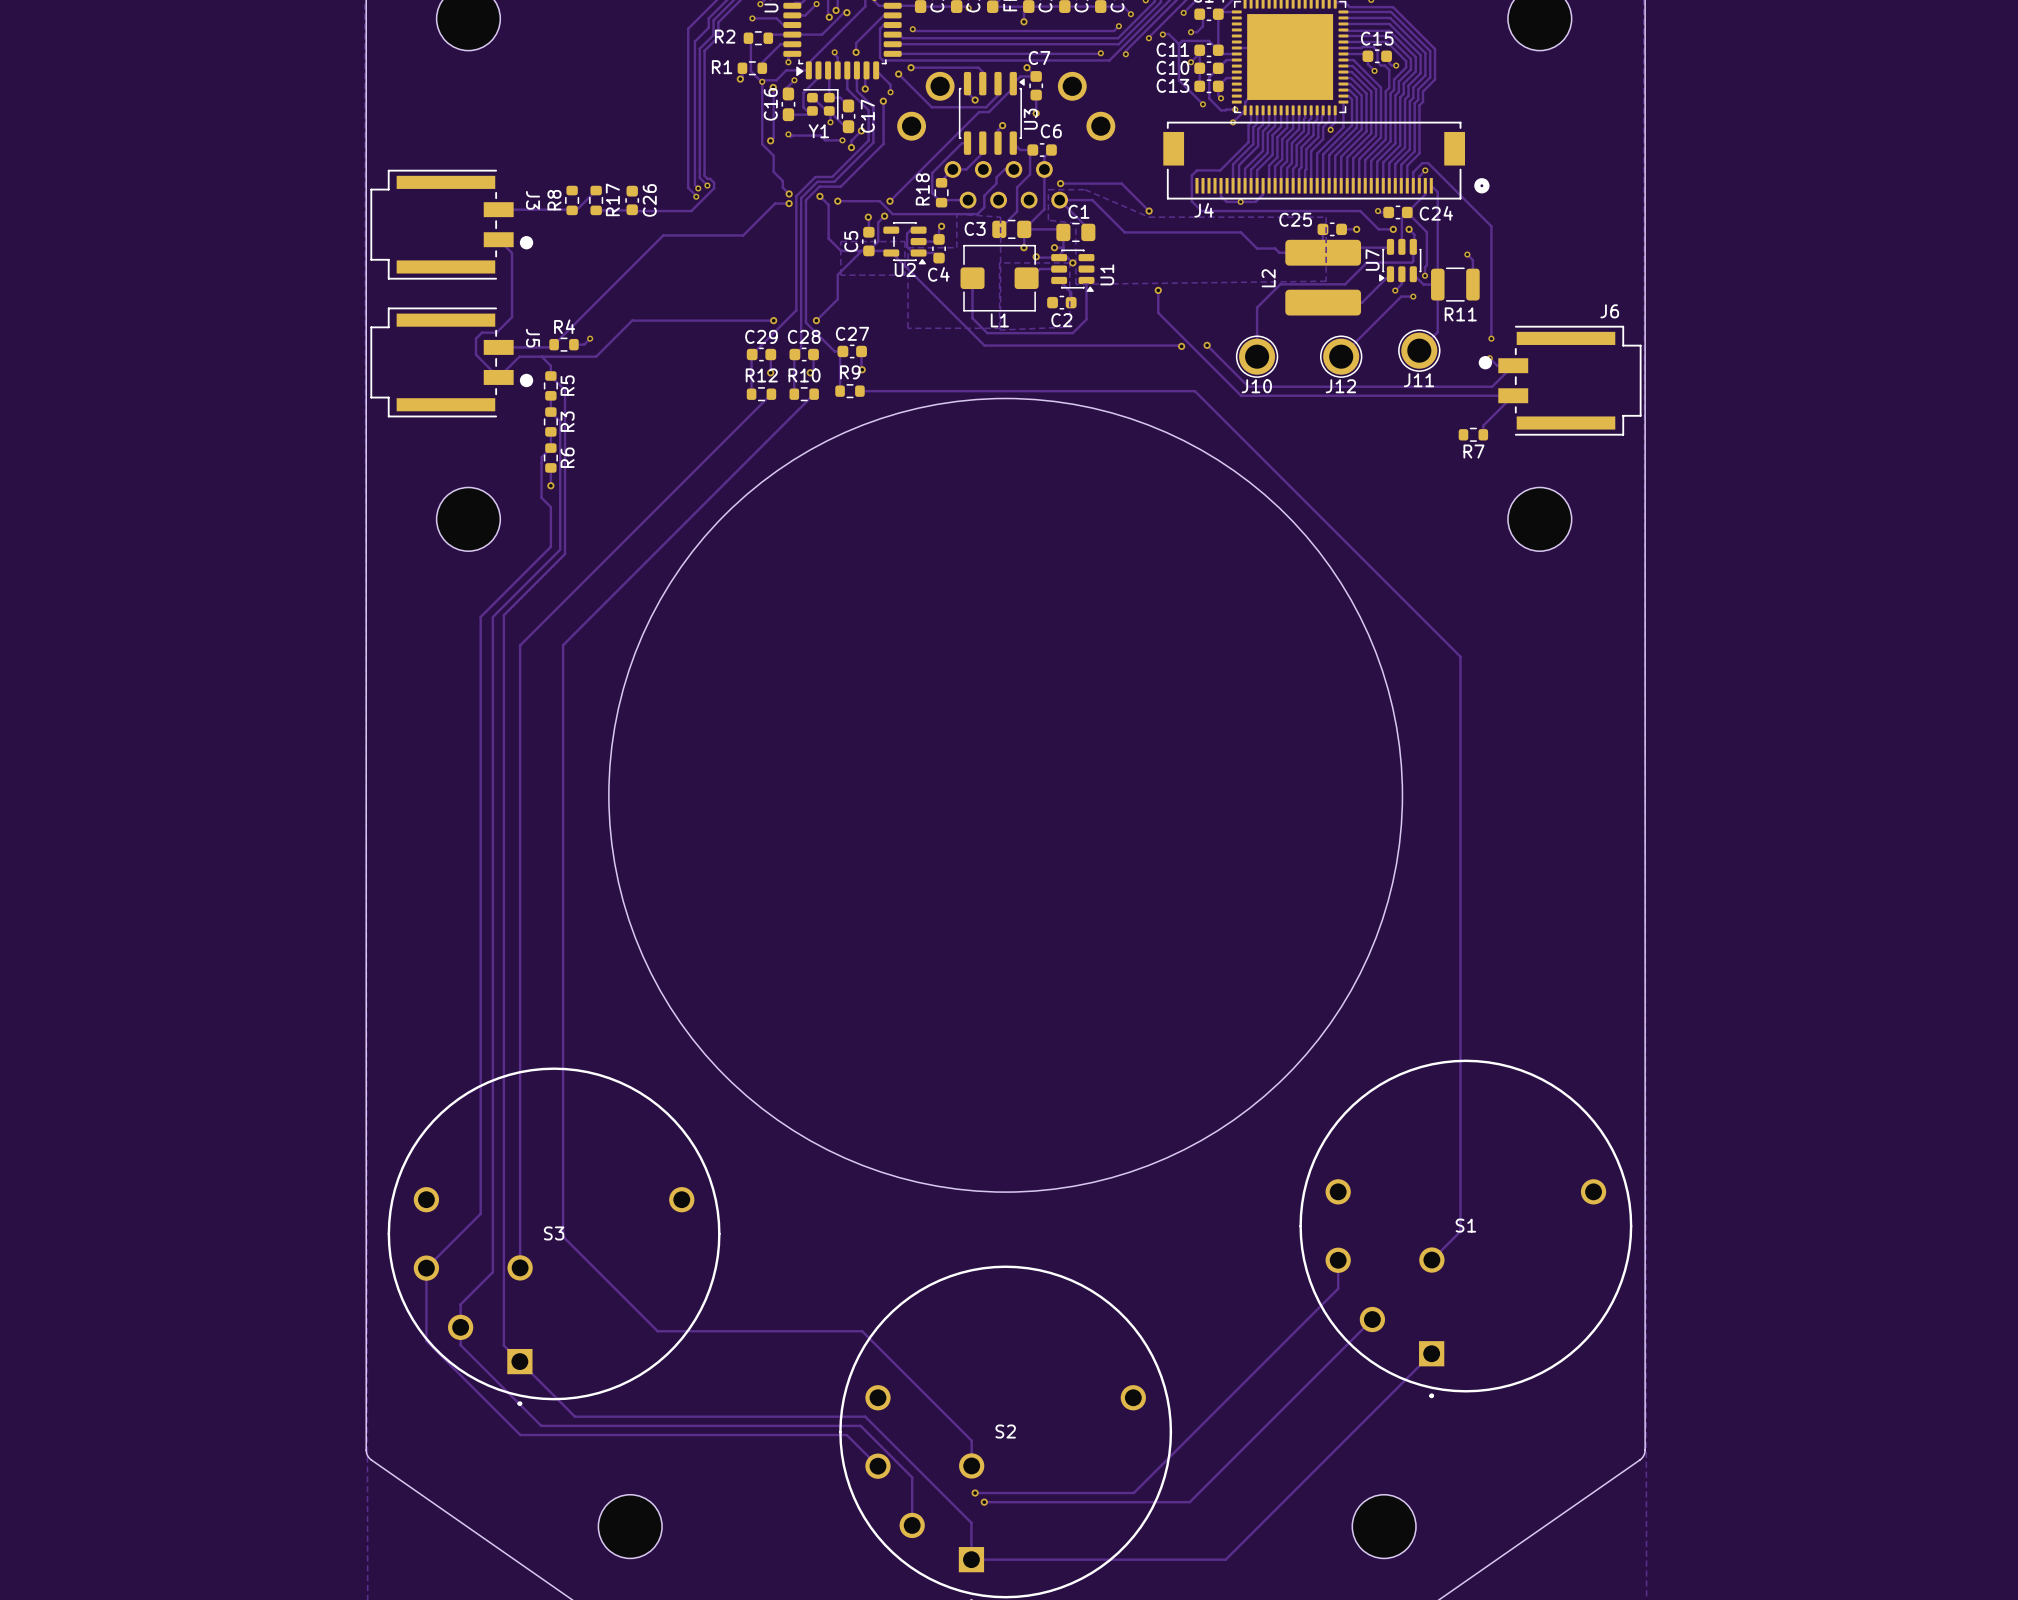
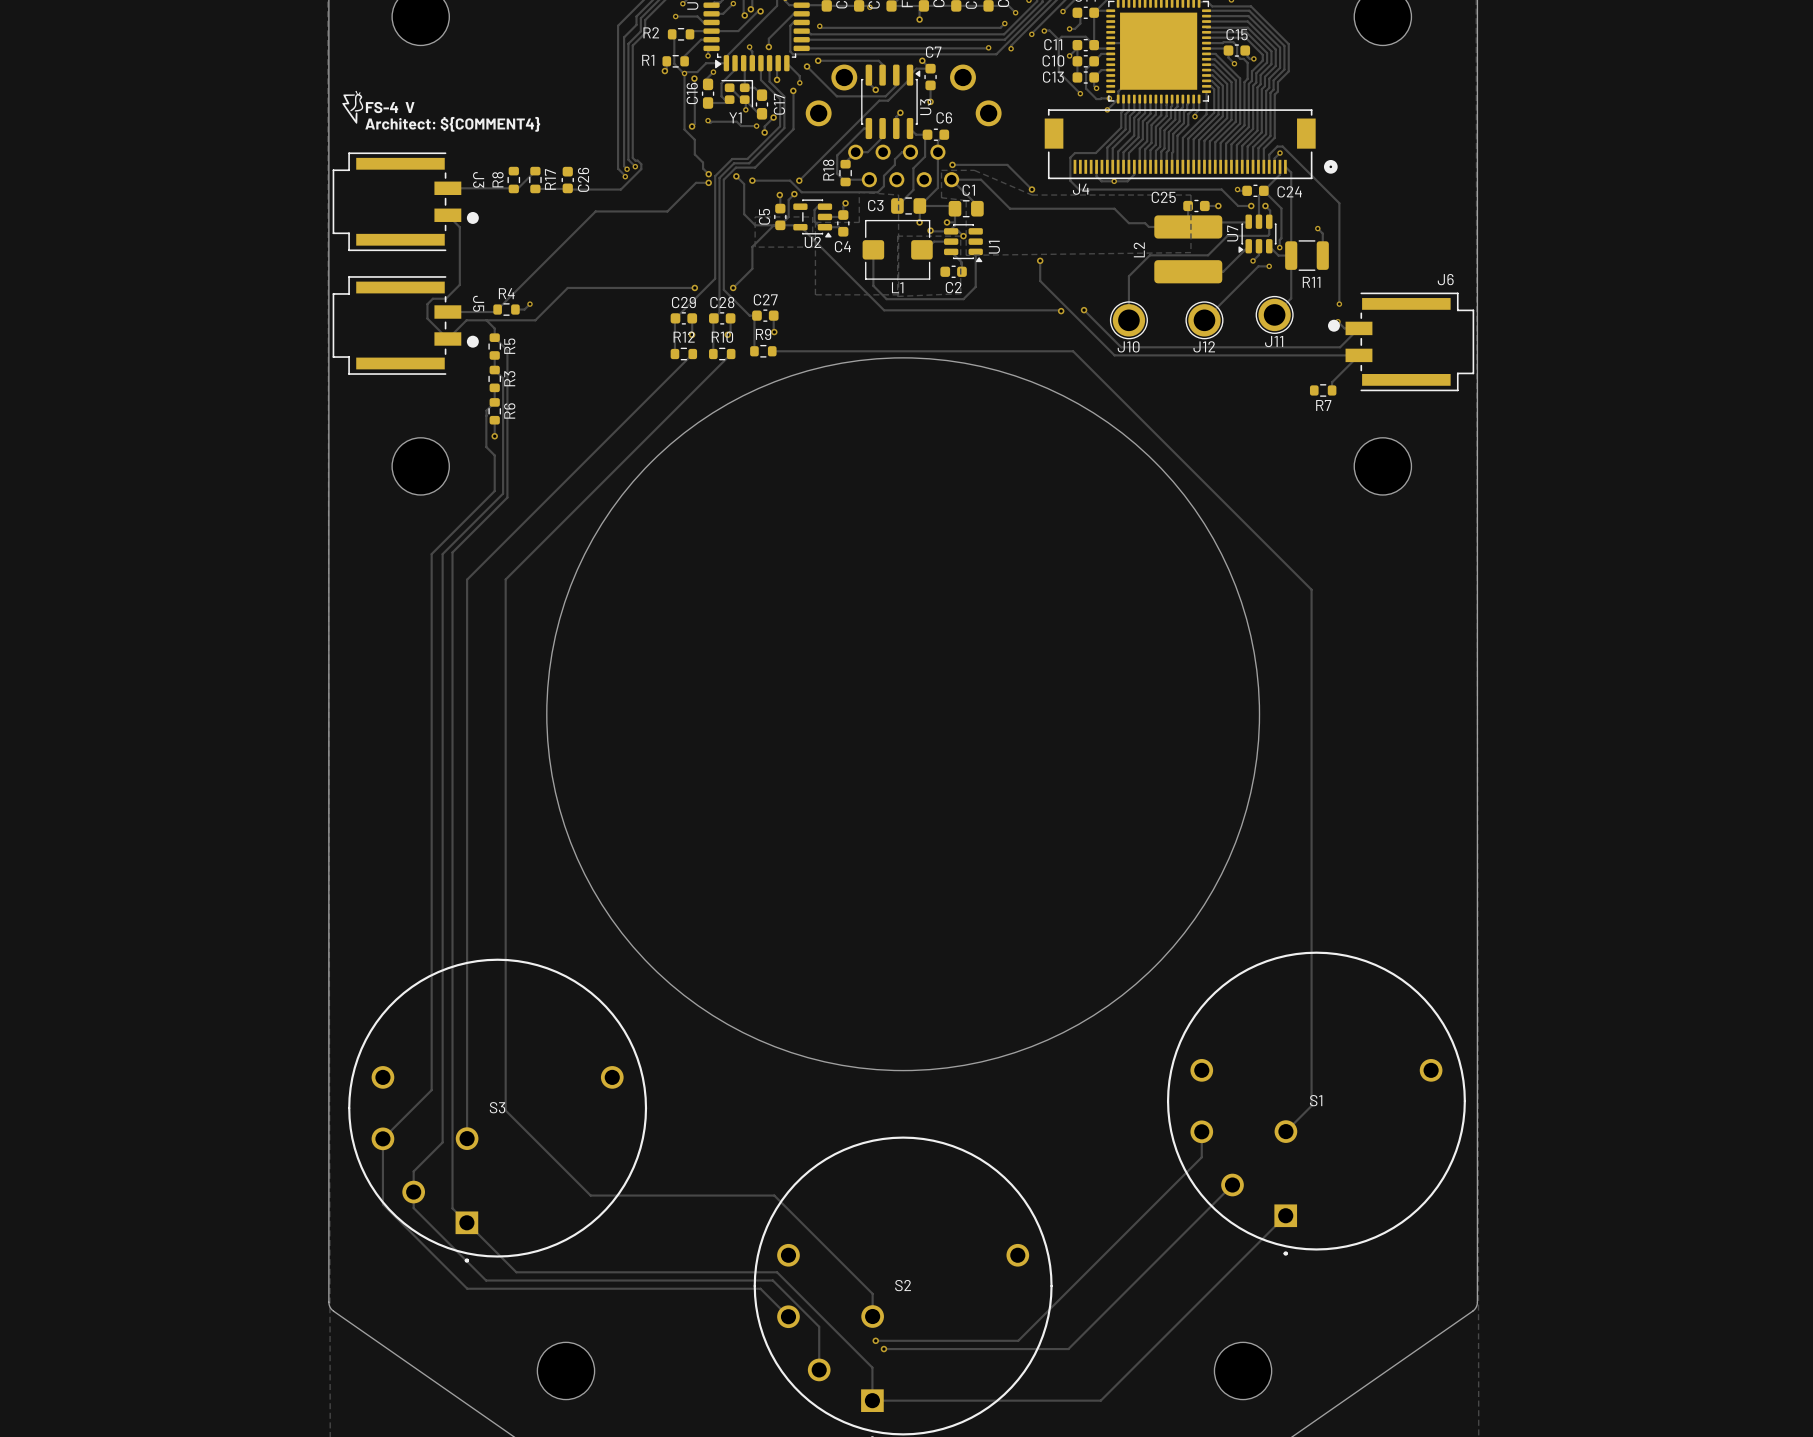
drawing: none -> [342, 90, 364, 124]

